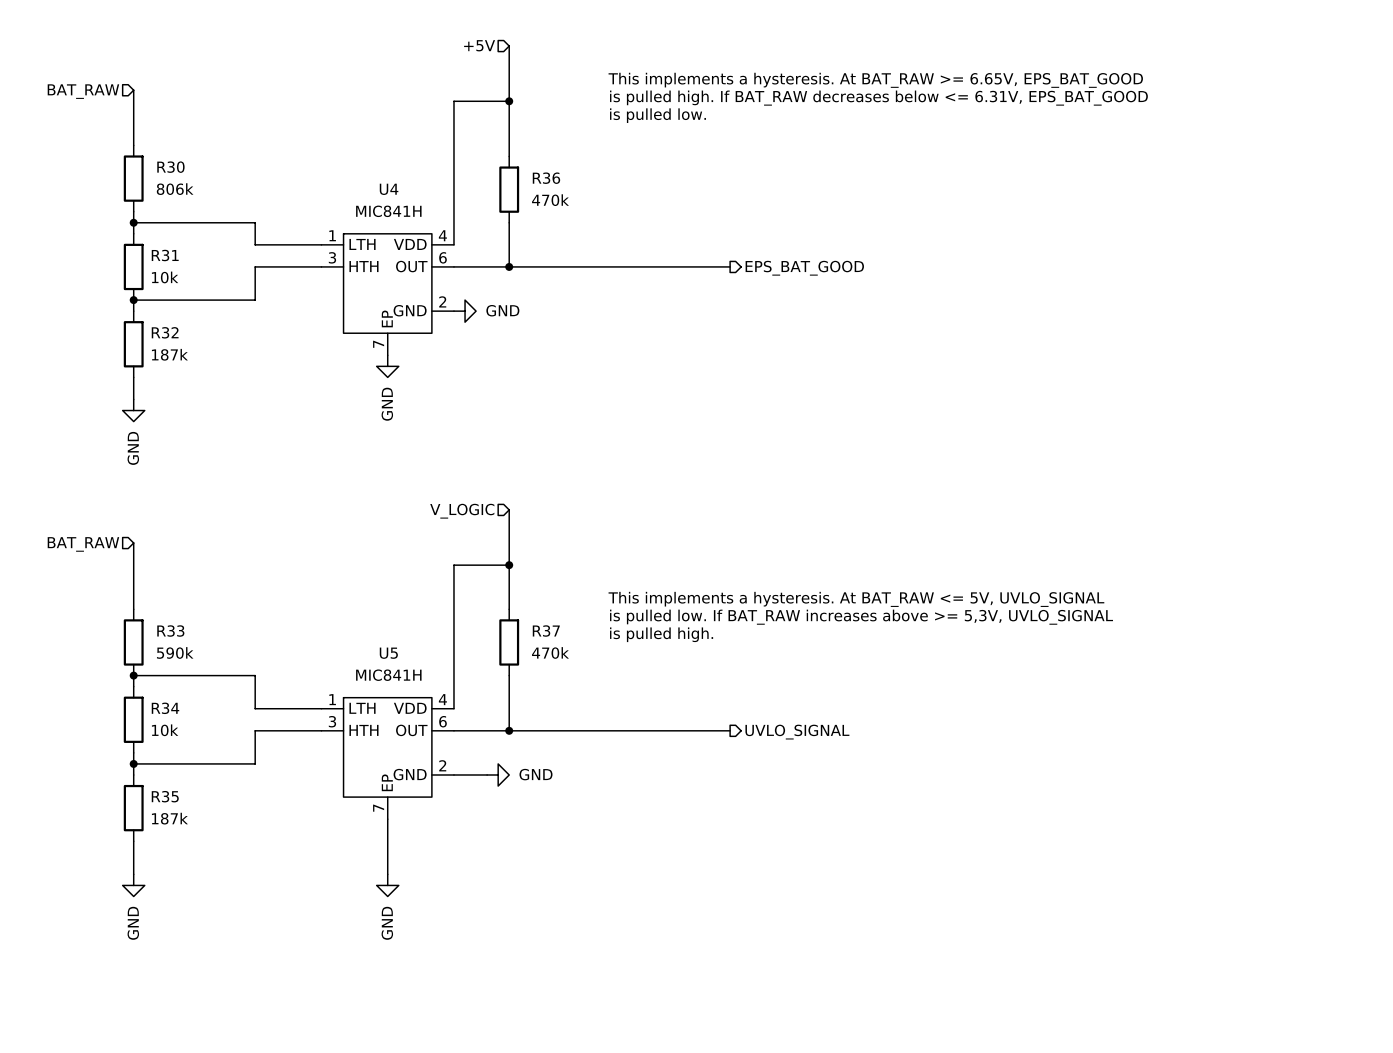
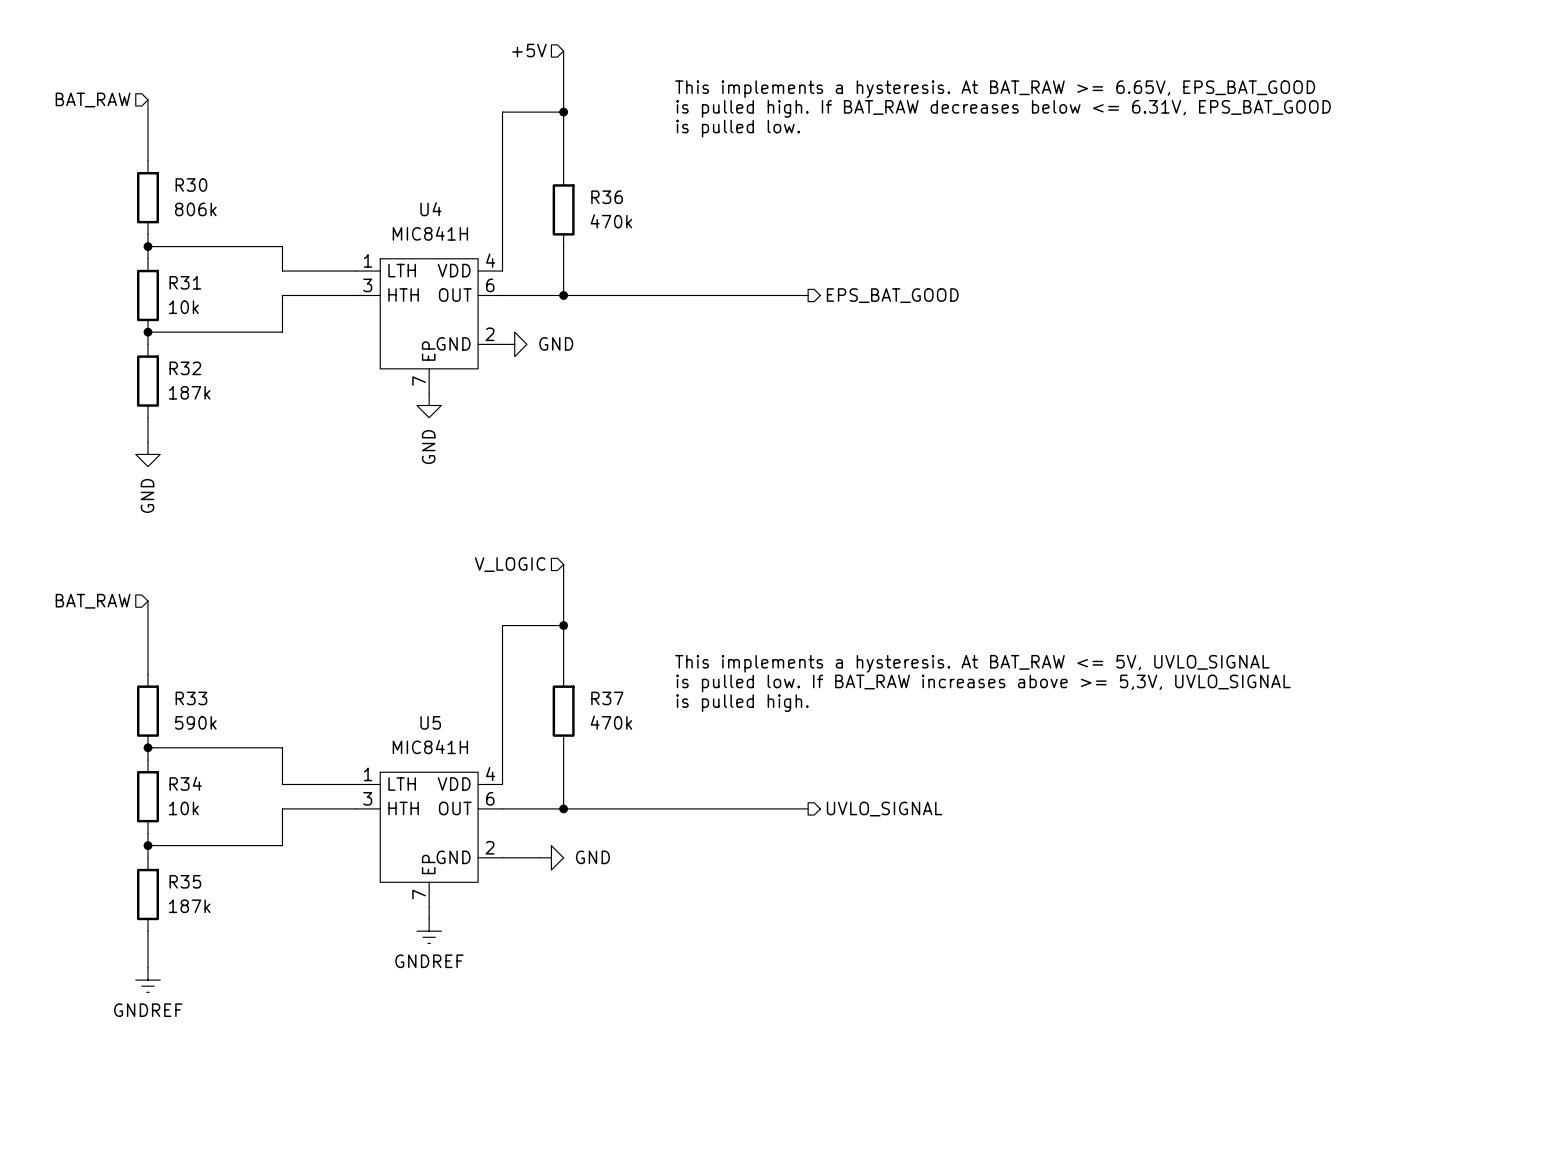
wire: (387, 830) (387, 874) -> none
power symbol: none -> GNDREF (429, 931)
power symbol: GND (133, 885) -> GNDREF (147, 980)
power symbol: GND (387, 885) -> none

